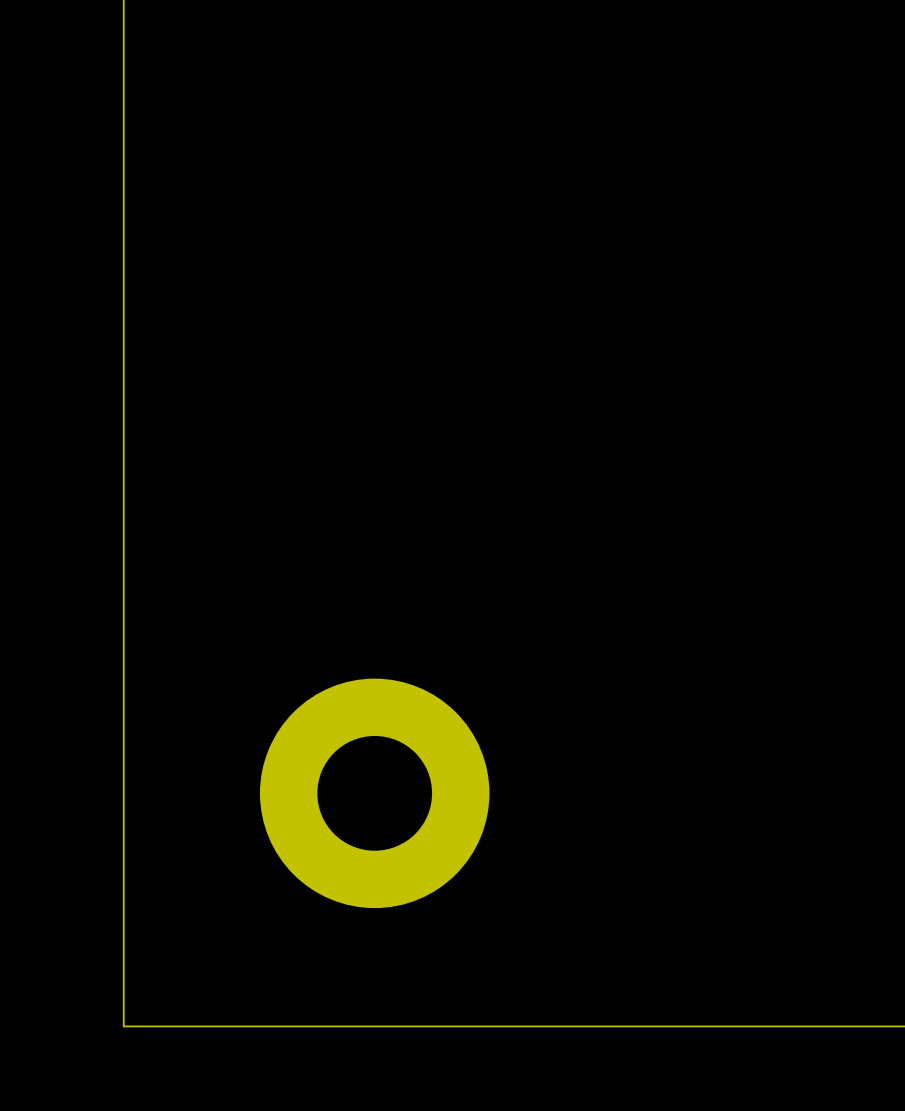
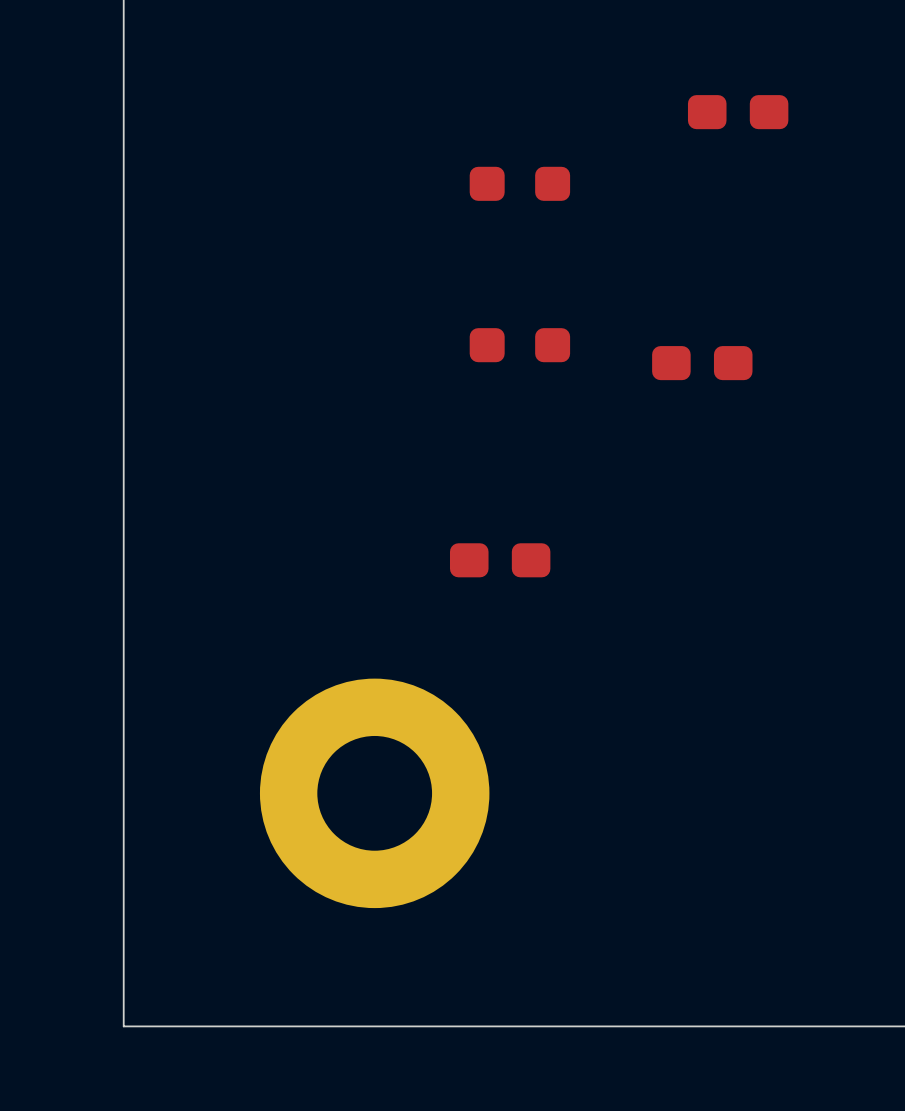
part: none -> (738, 112)
part: none -> (519, 183)
part: none -> (519, 345)
part: none -> (702, 363)
part: none -> (500, 560)

